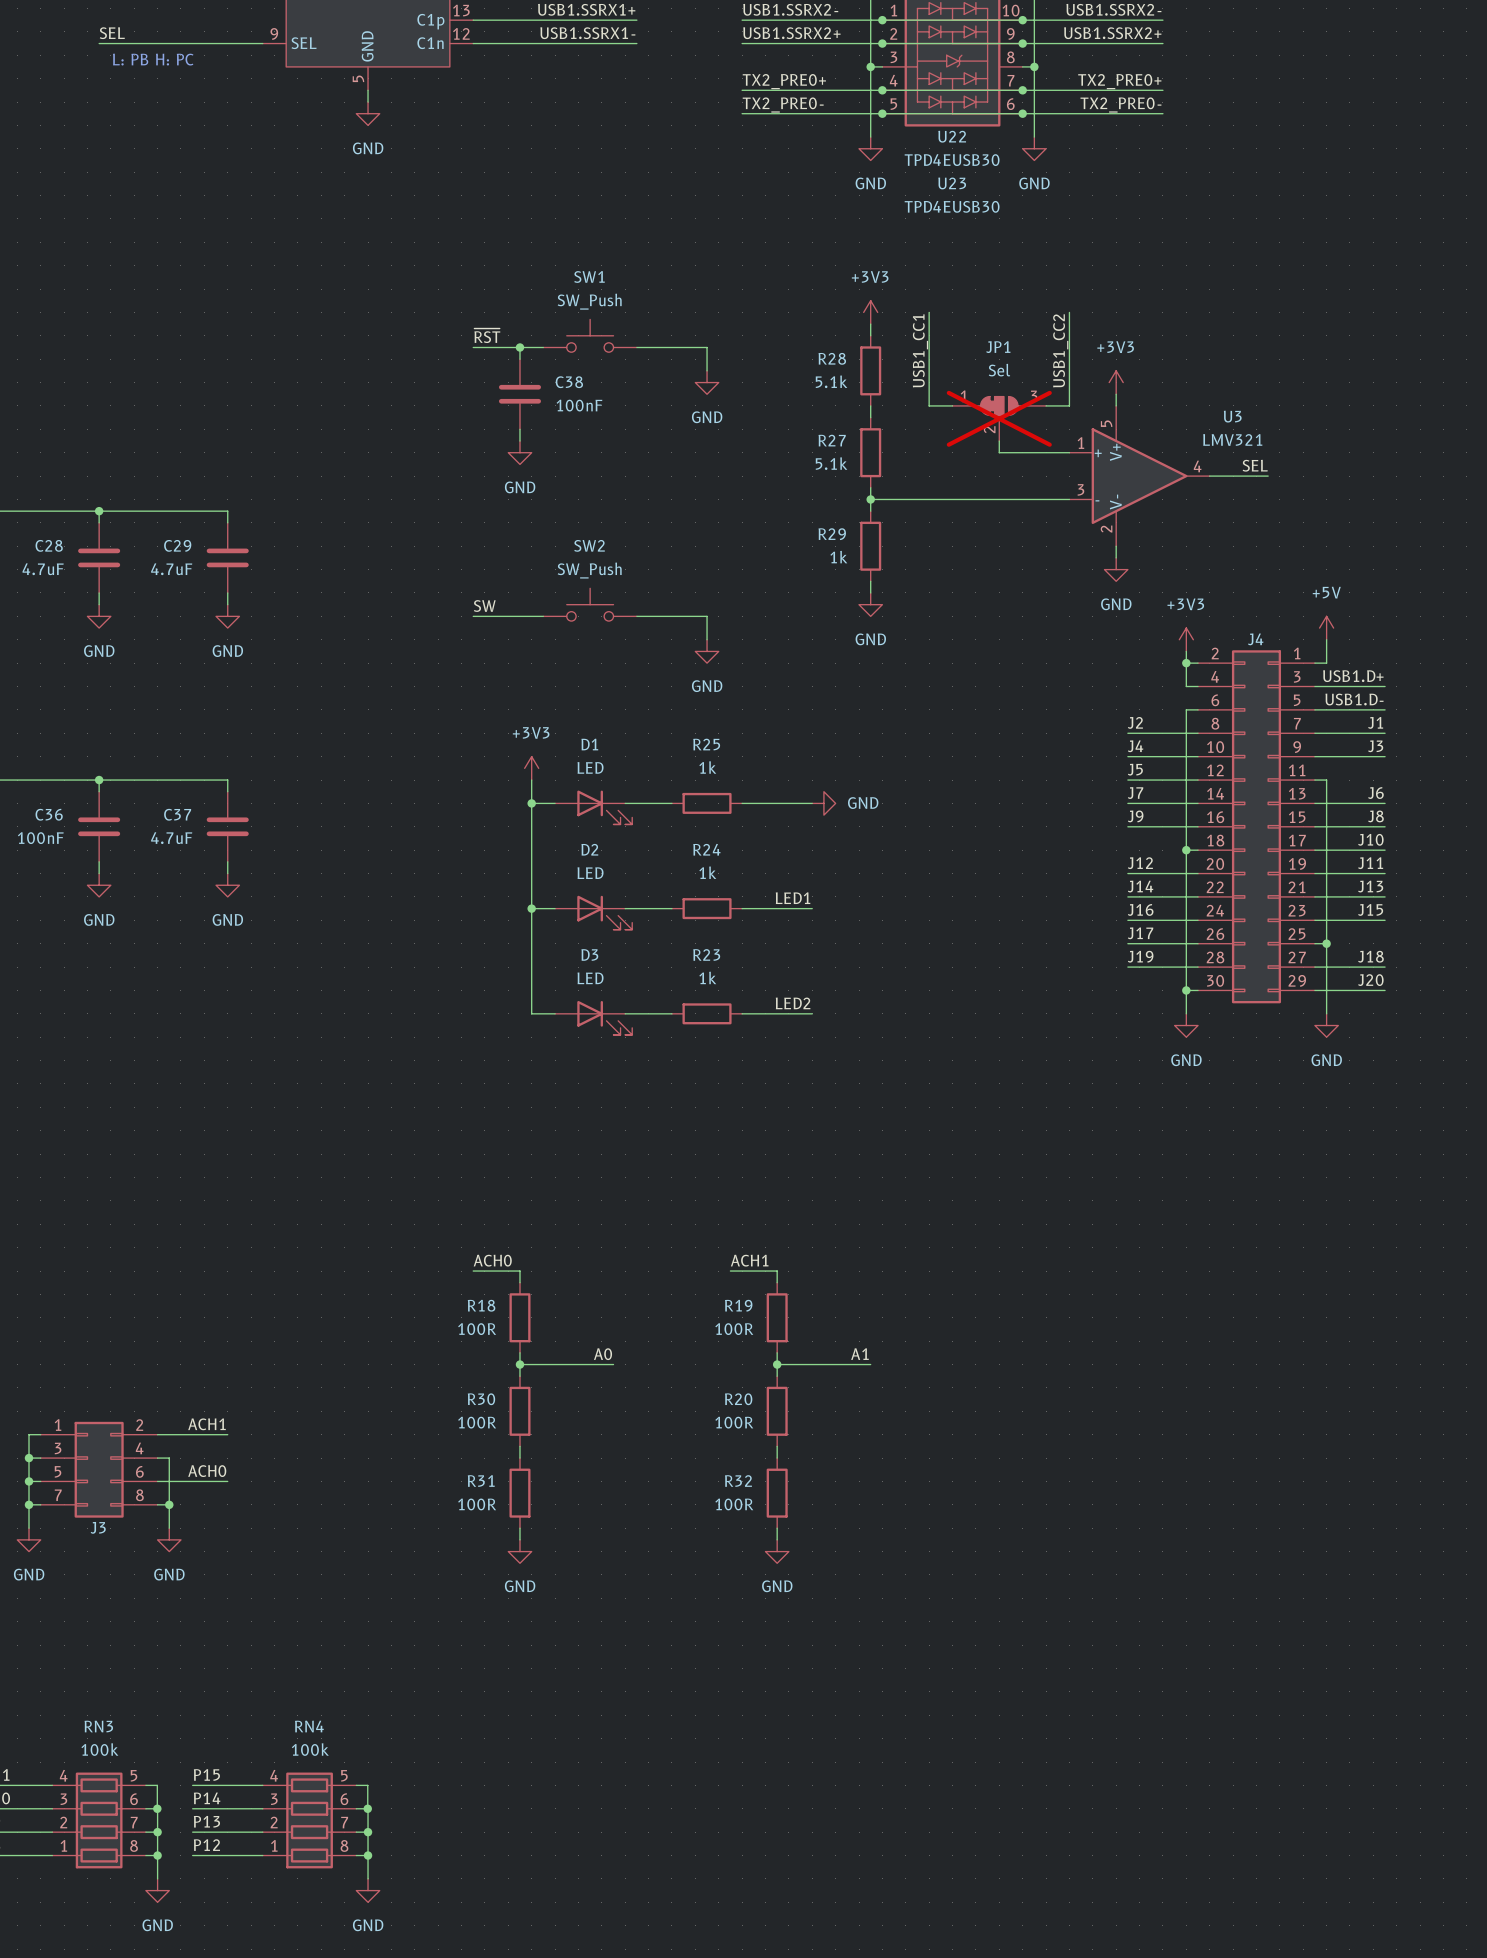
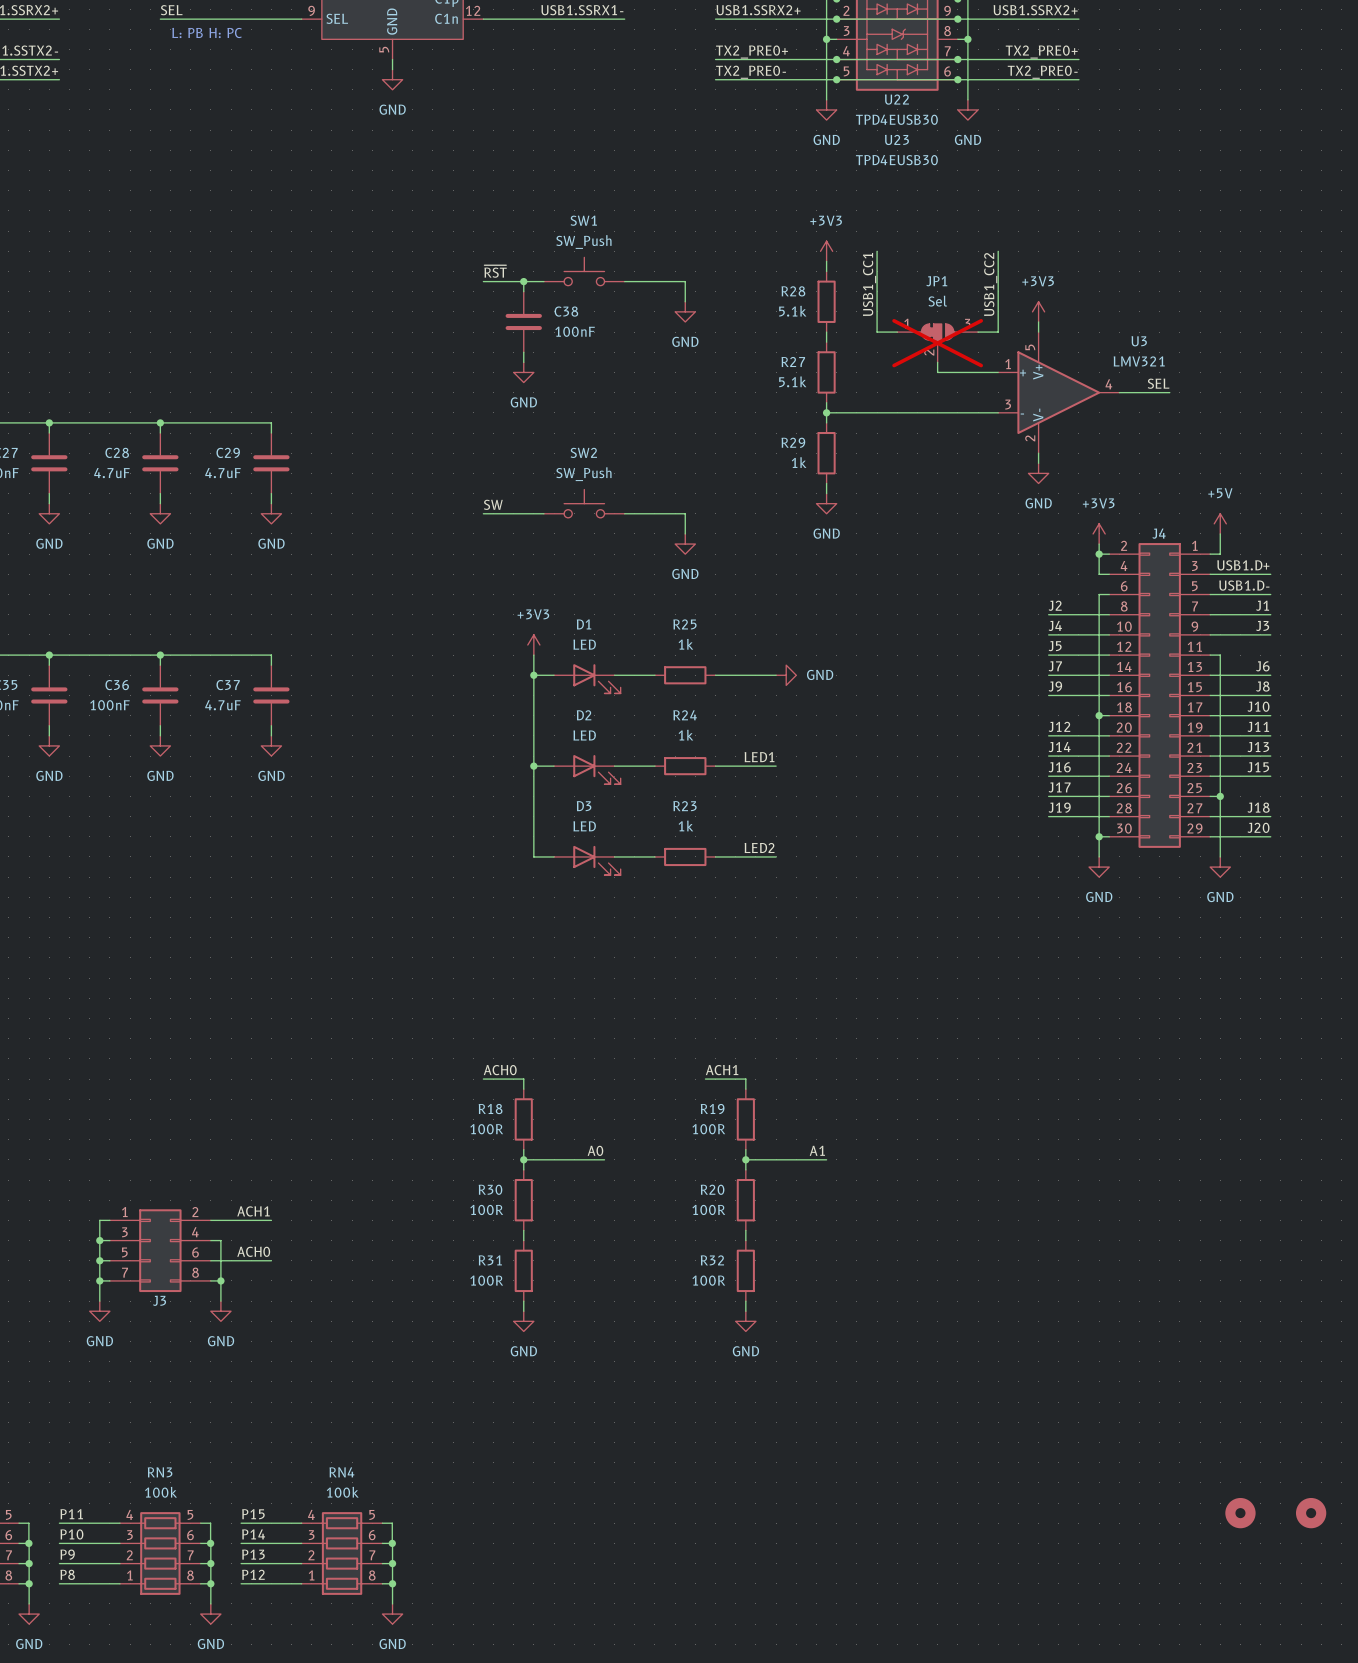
part: none -> (1240, 1513)
part: none -> (1311, 1513)

